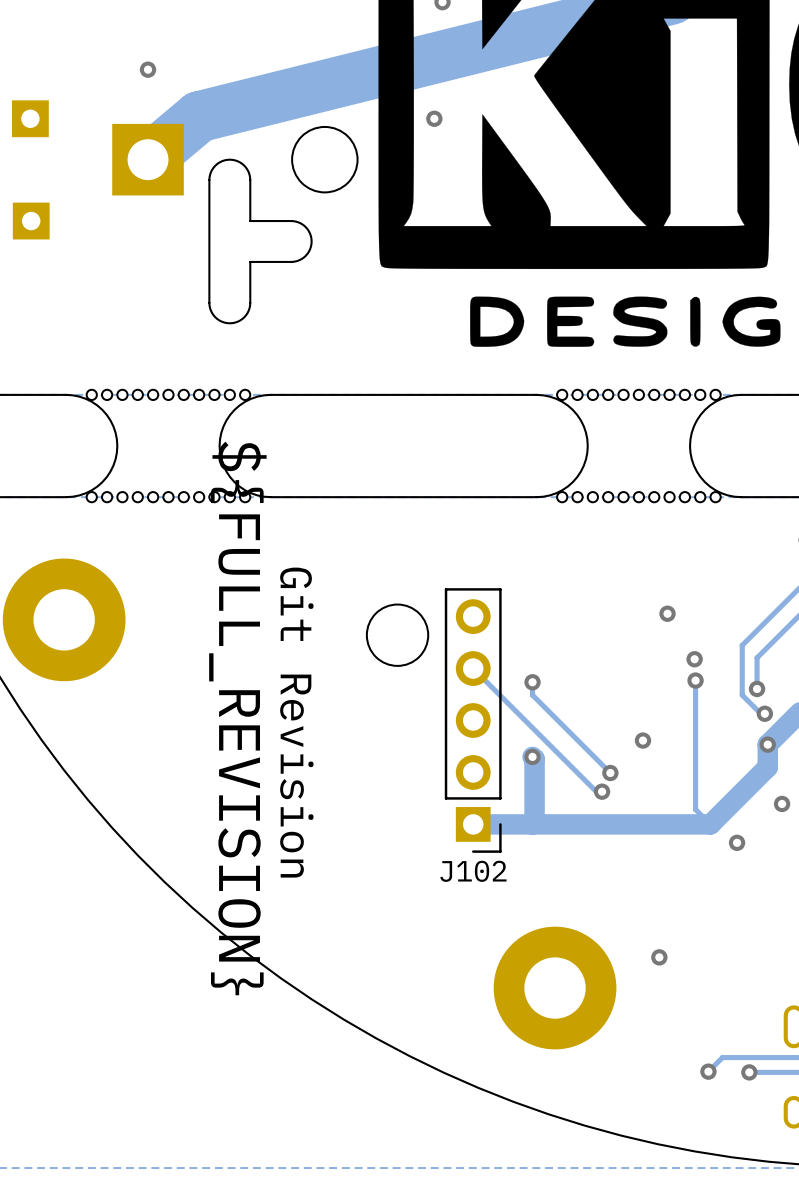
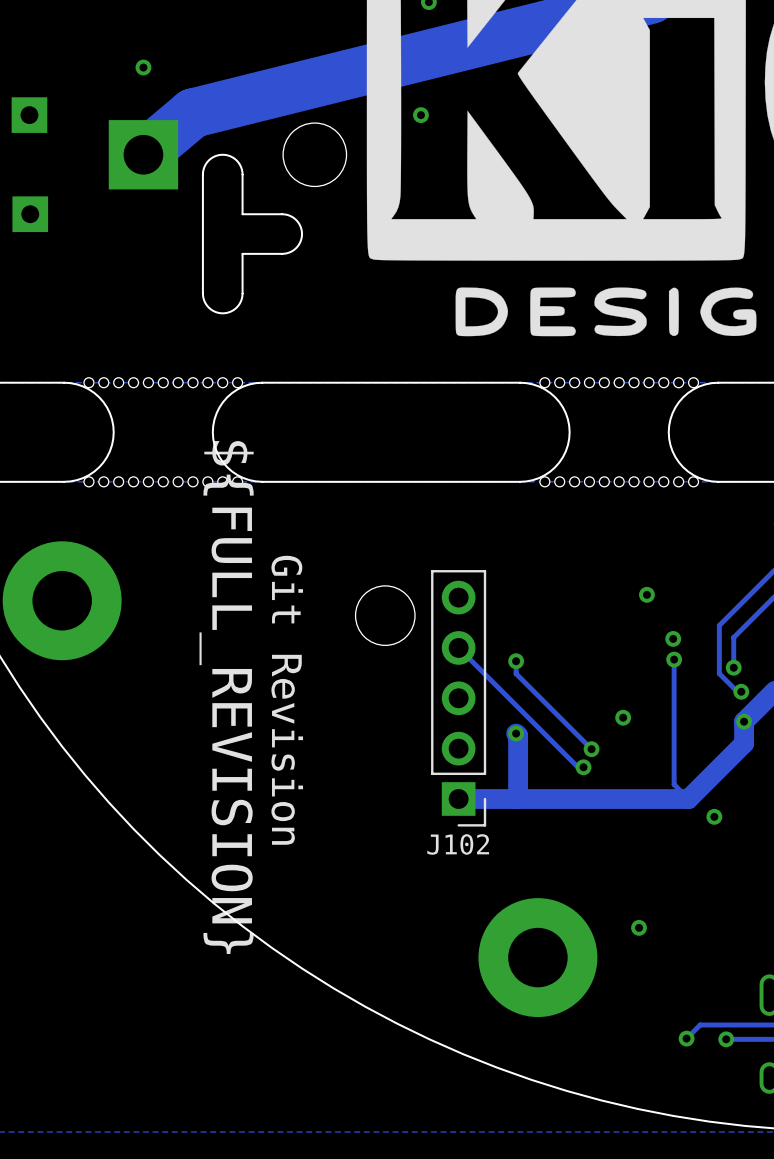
via: (782, 803) -> none

